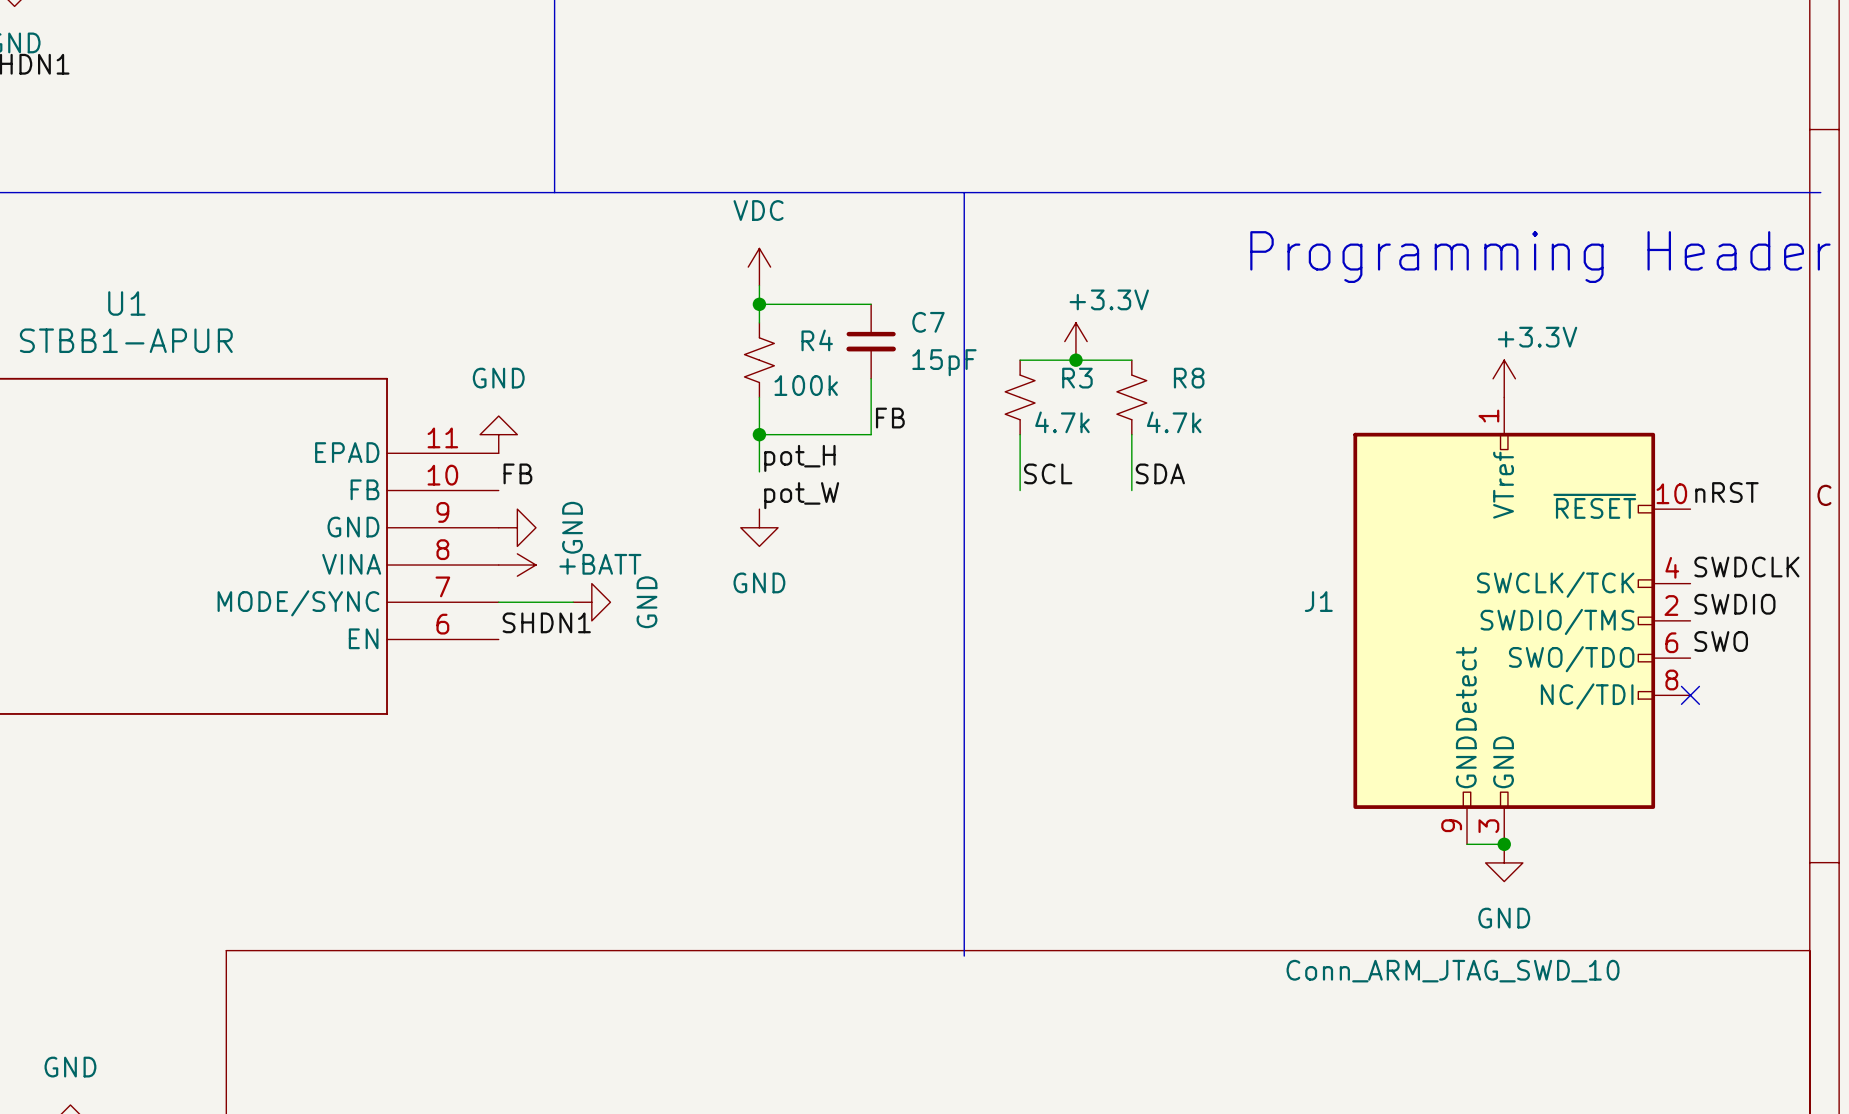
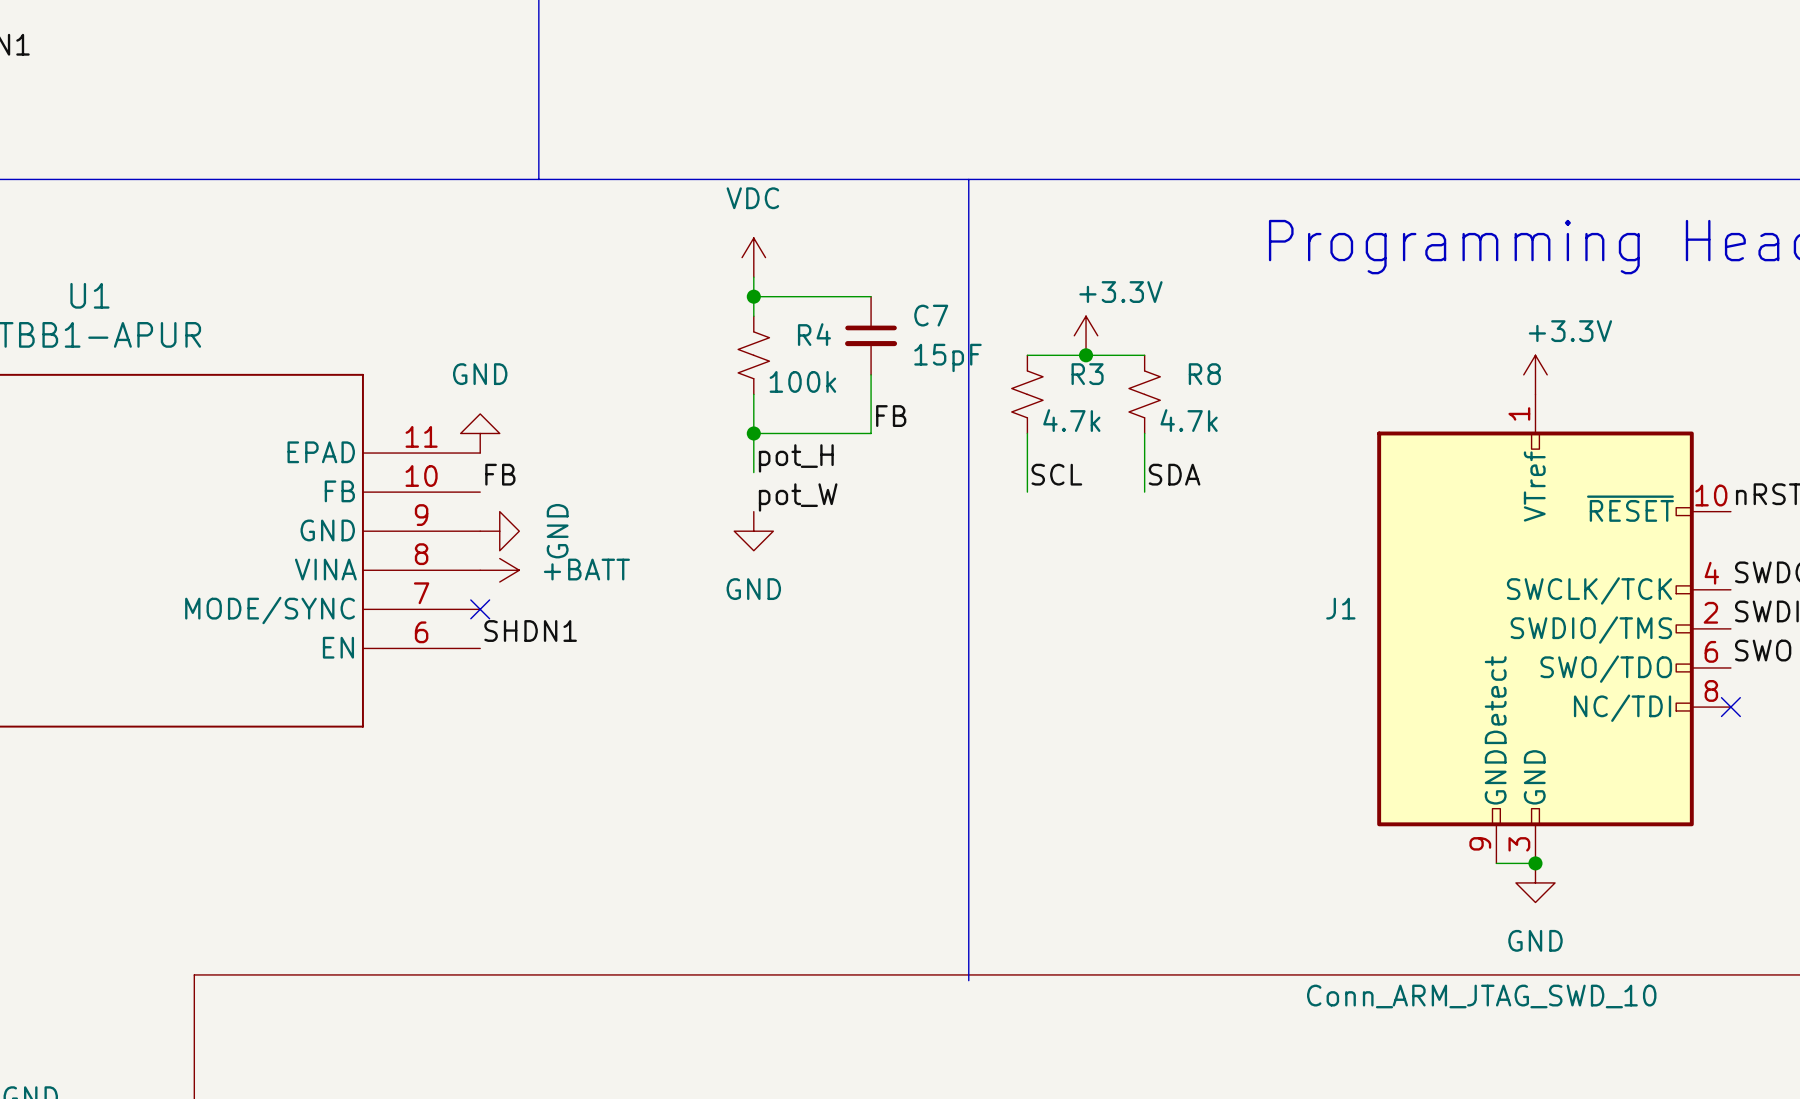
wire: (498, 602) (573, 602) -> none
no-connect mark: none -> (480, 609)
power symbol: GND (591, 602) -> none

